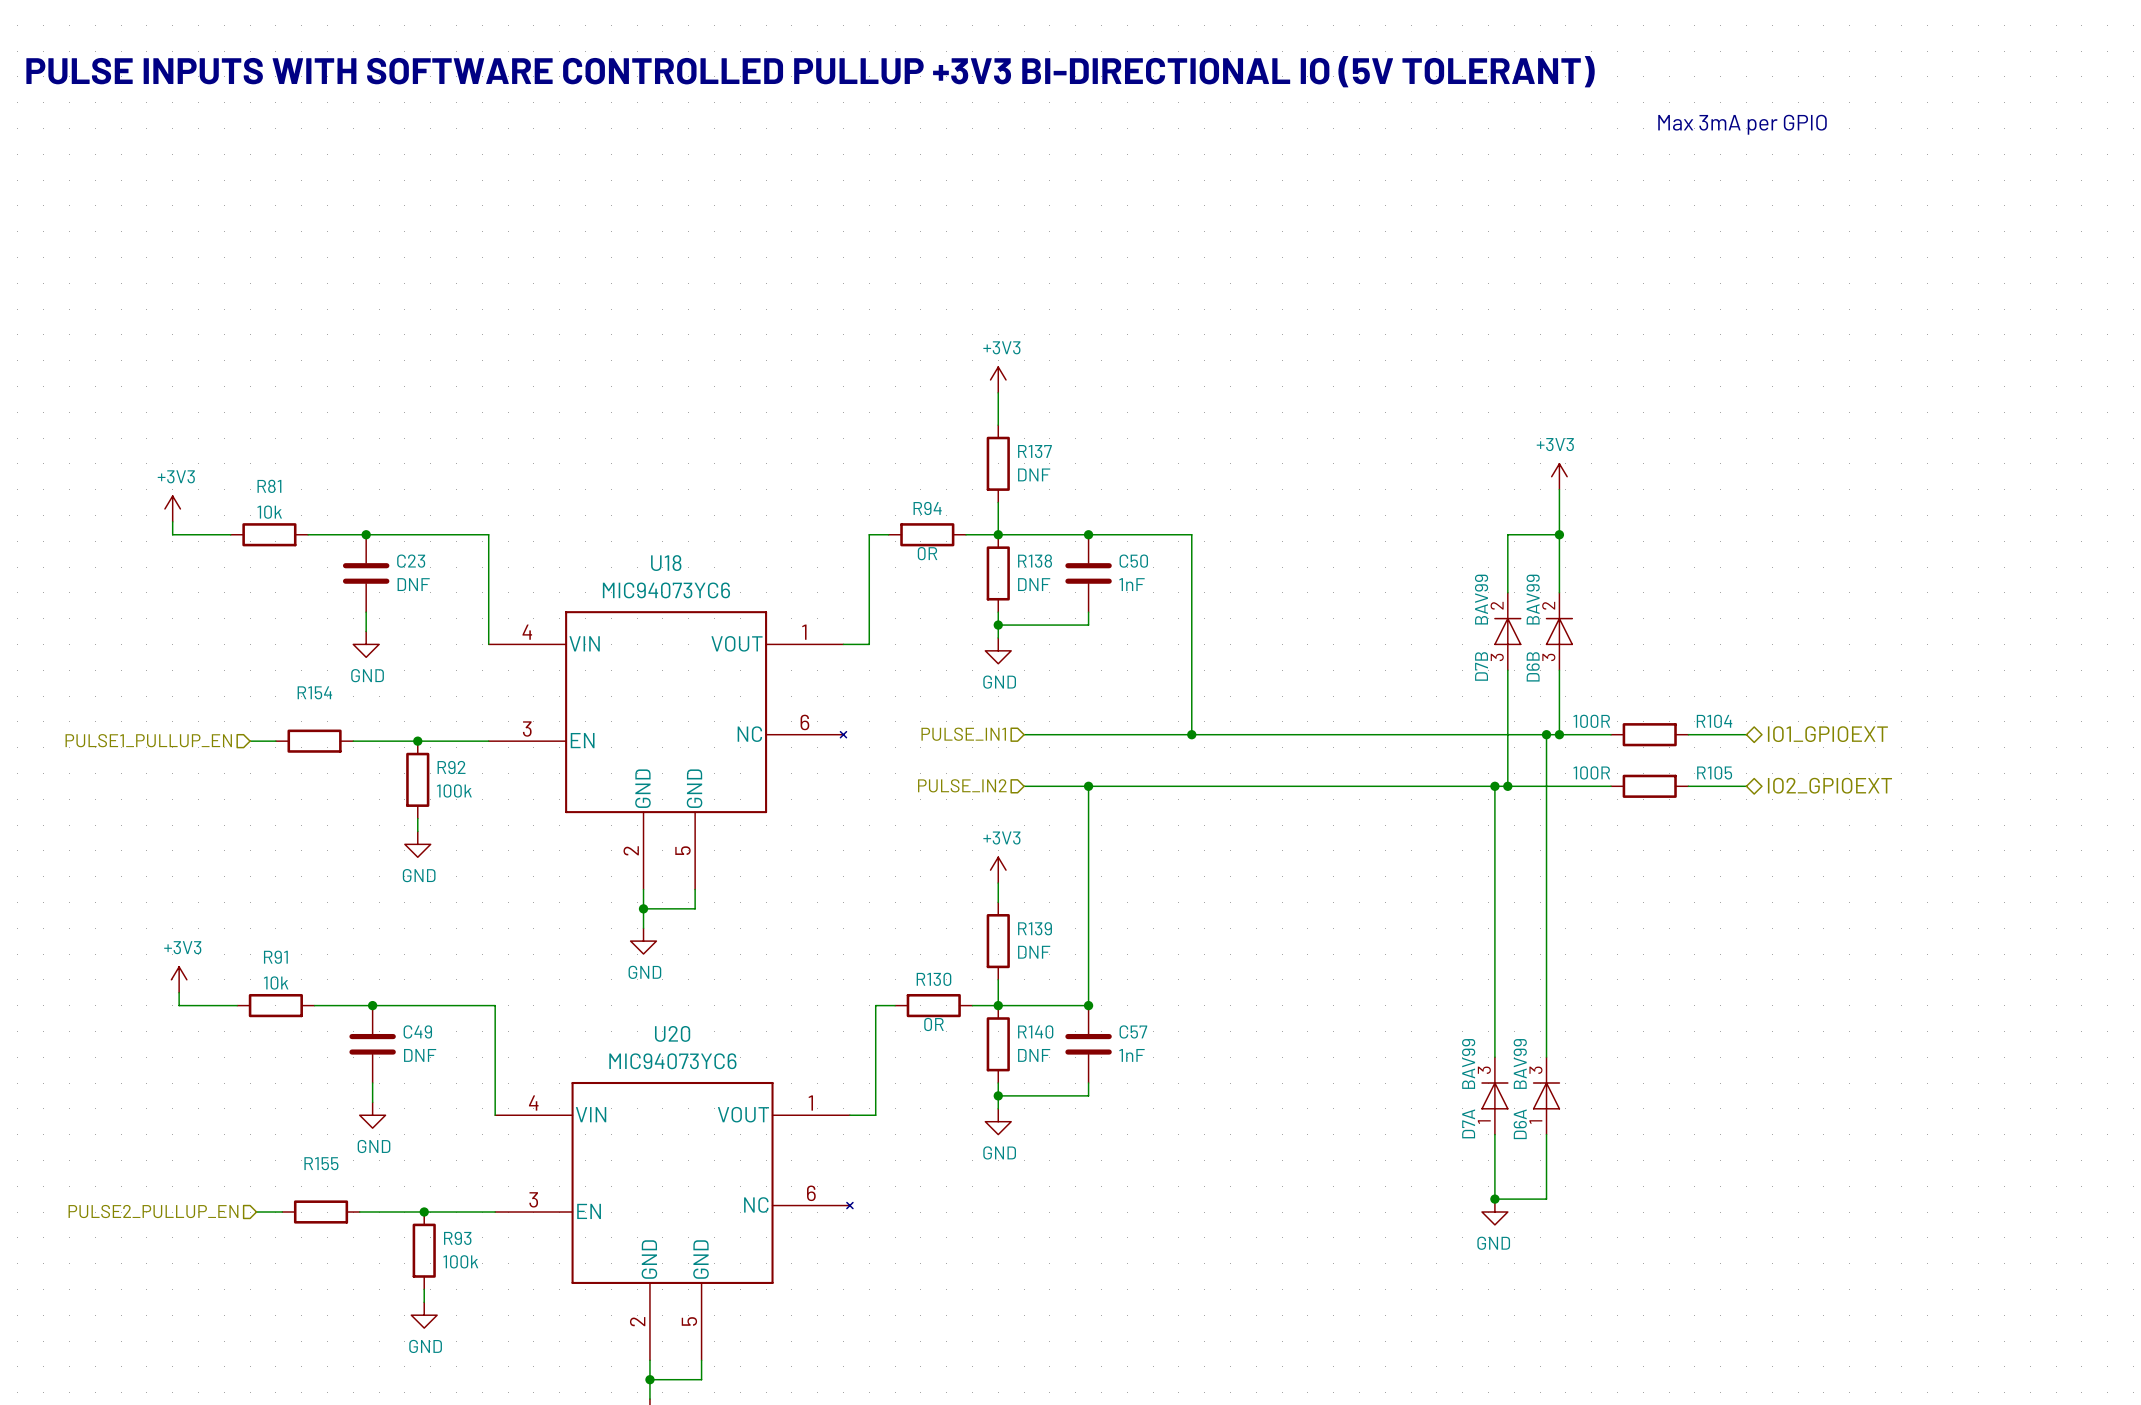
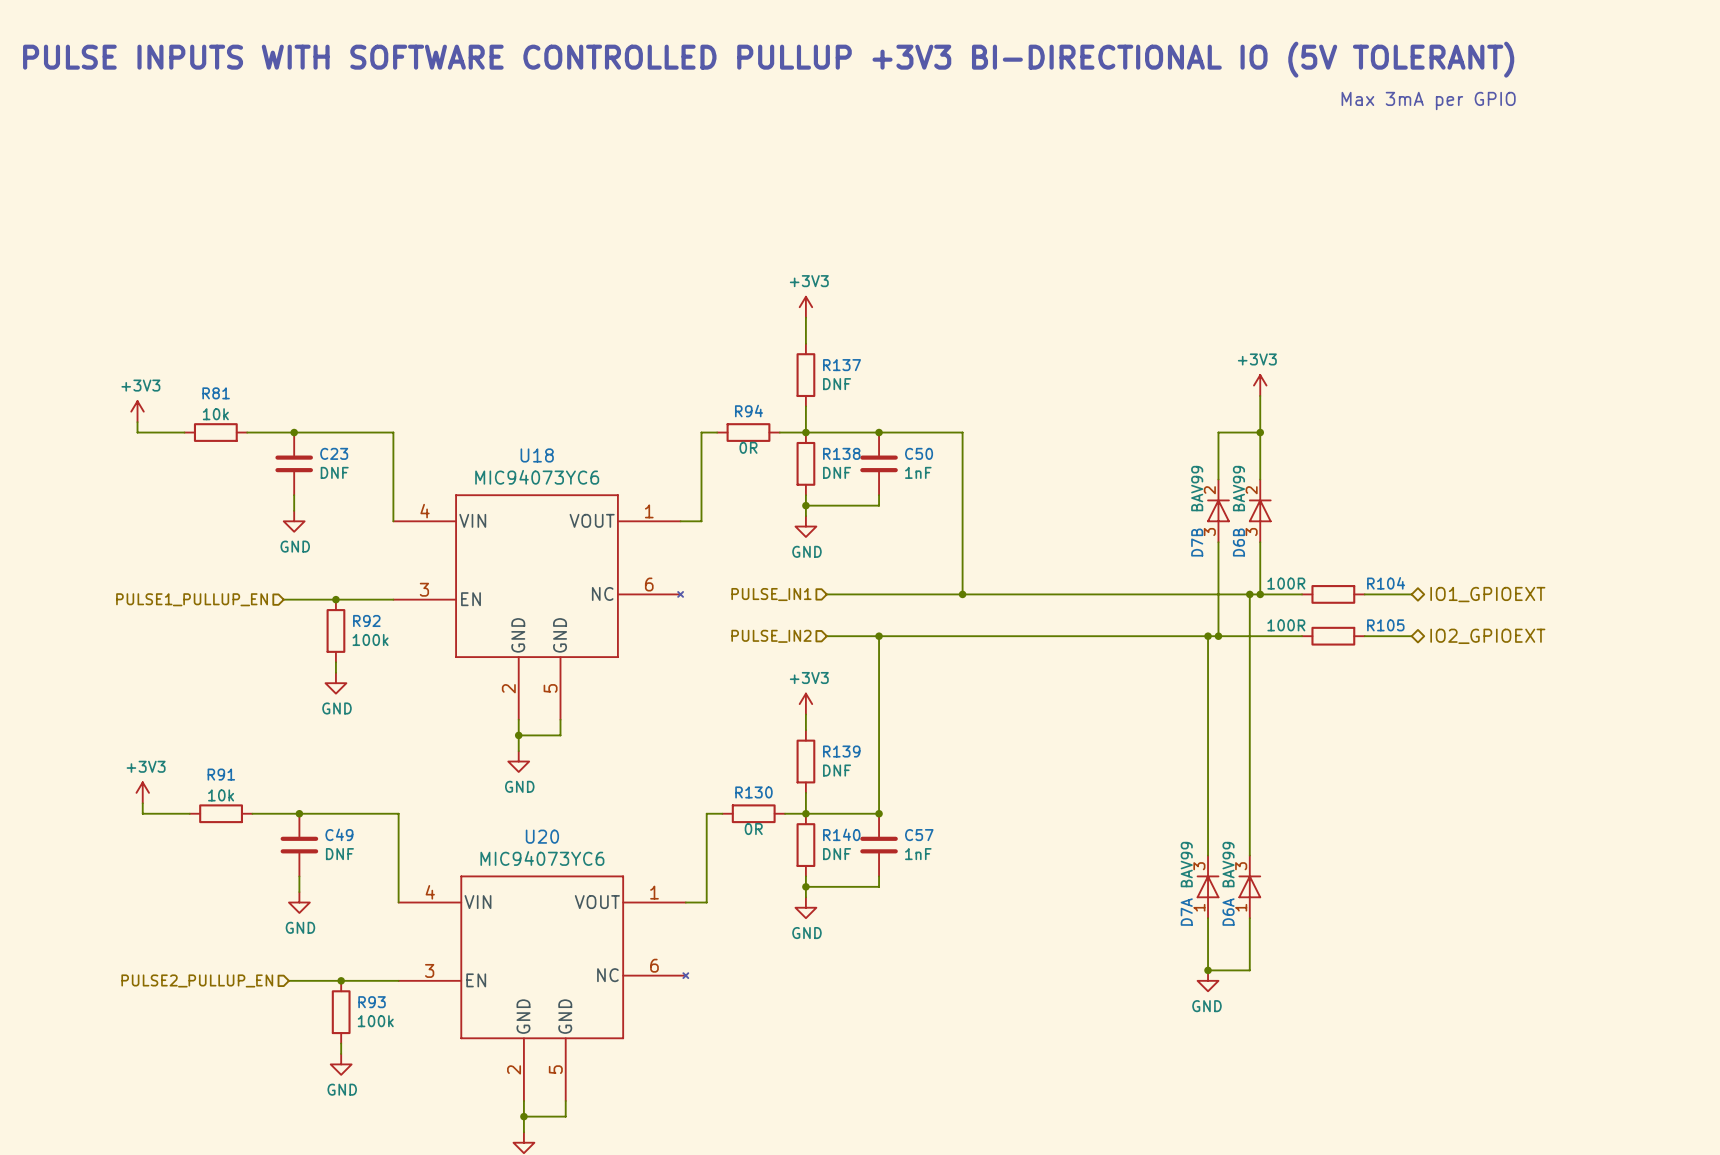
hierarchical label position: PULSE1_PULLUP_EN (148, 740) -> PULSE1_PULLUP_EN (192, 599)
wire: (250, 741) (275, 741) -> none
R154: (314, 741) -> none
hierarchical label position: PULSE2_PULLUP_EN (153, 1211) -> PULSE2_PULLUP_EN (197, 980)
wire: (256, 1212) (282, 1212) -> none
R155: (321, 1212) -> none

